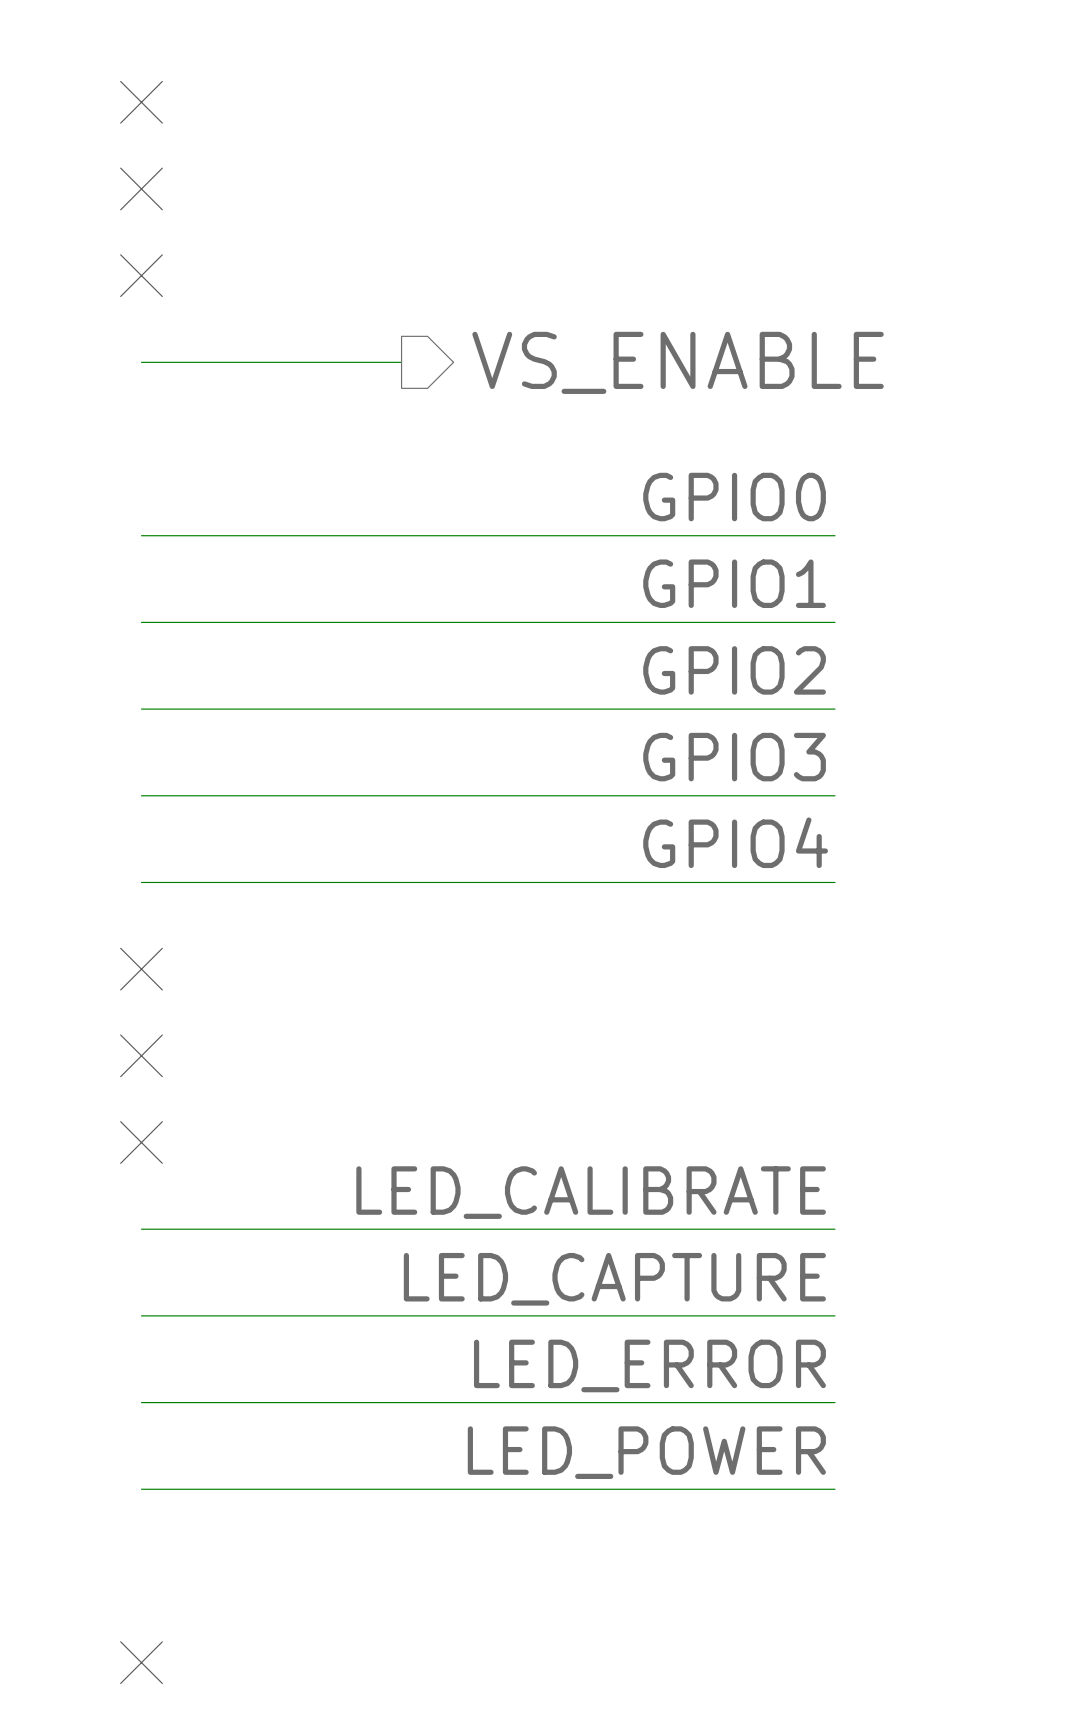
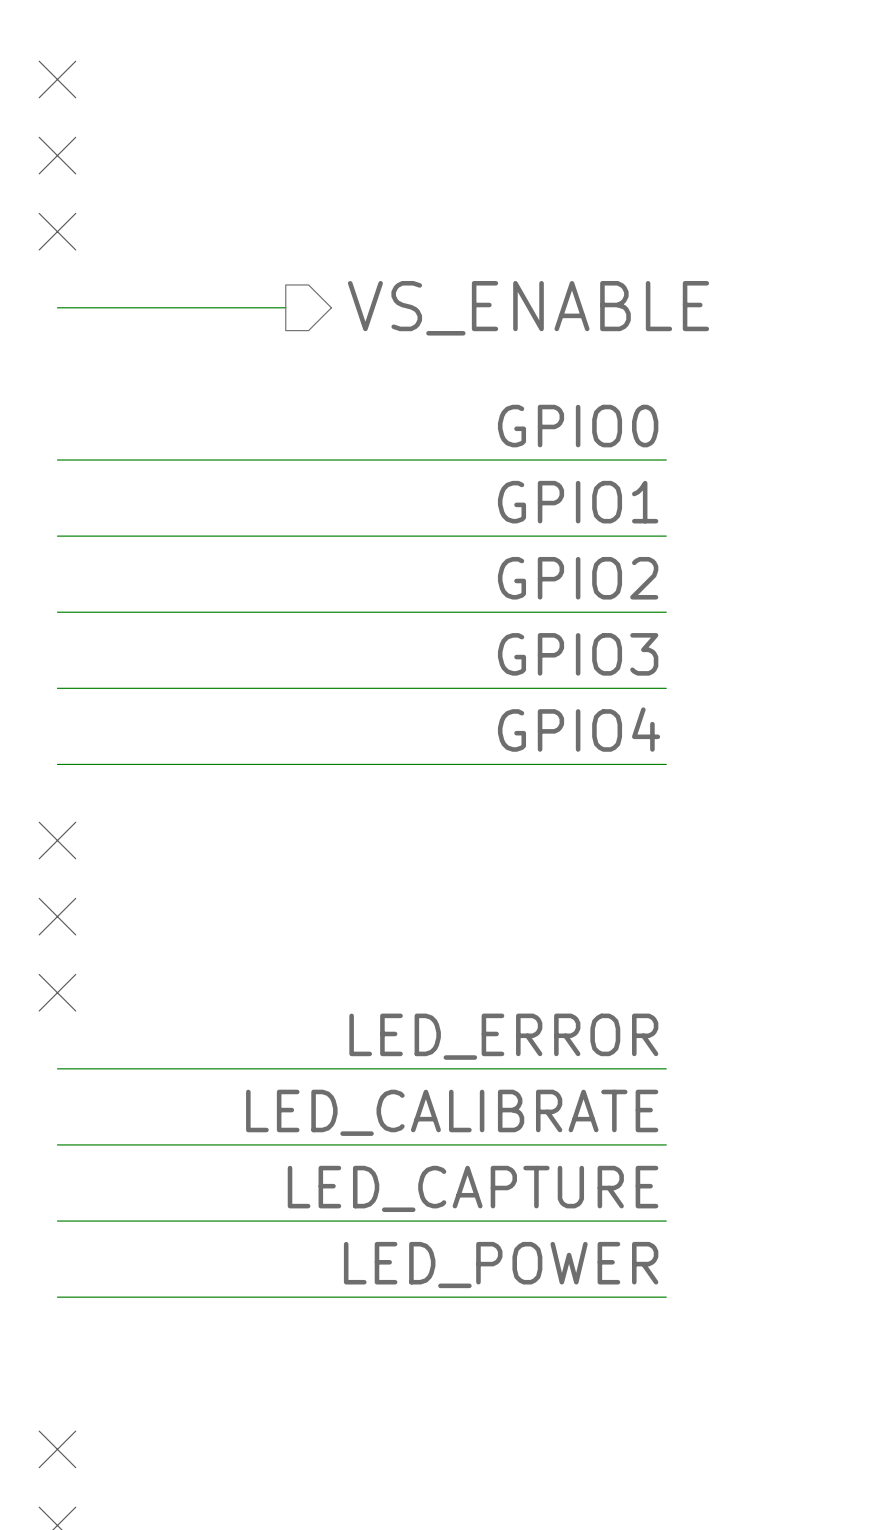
label: LED_CALIBRATE (591, 1192) -> LED_ERROR (503, 1036)
label: LED_CAPTURE (614, 1279) -> LED_CALIBRATE (452, 1112)
label: LED_ERROR (649, 1365) -> LED_CAPTURE (473, 1188)

